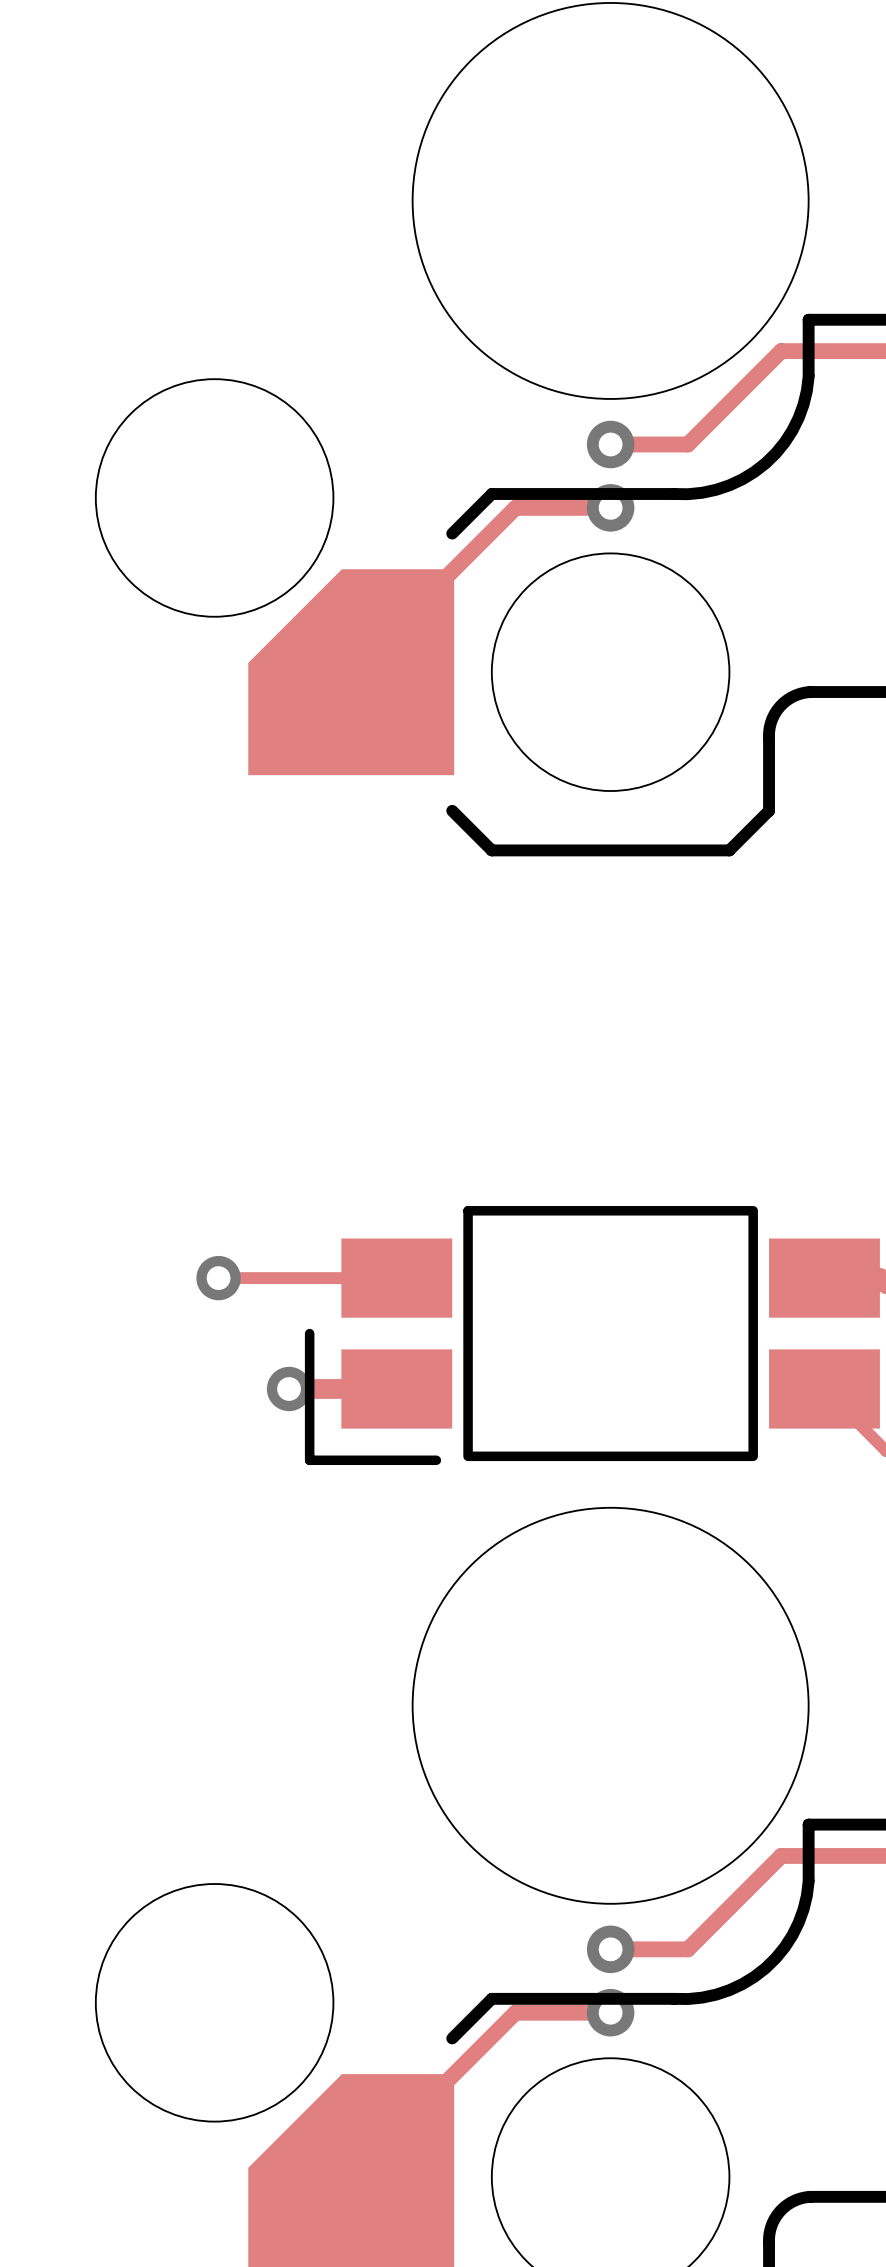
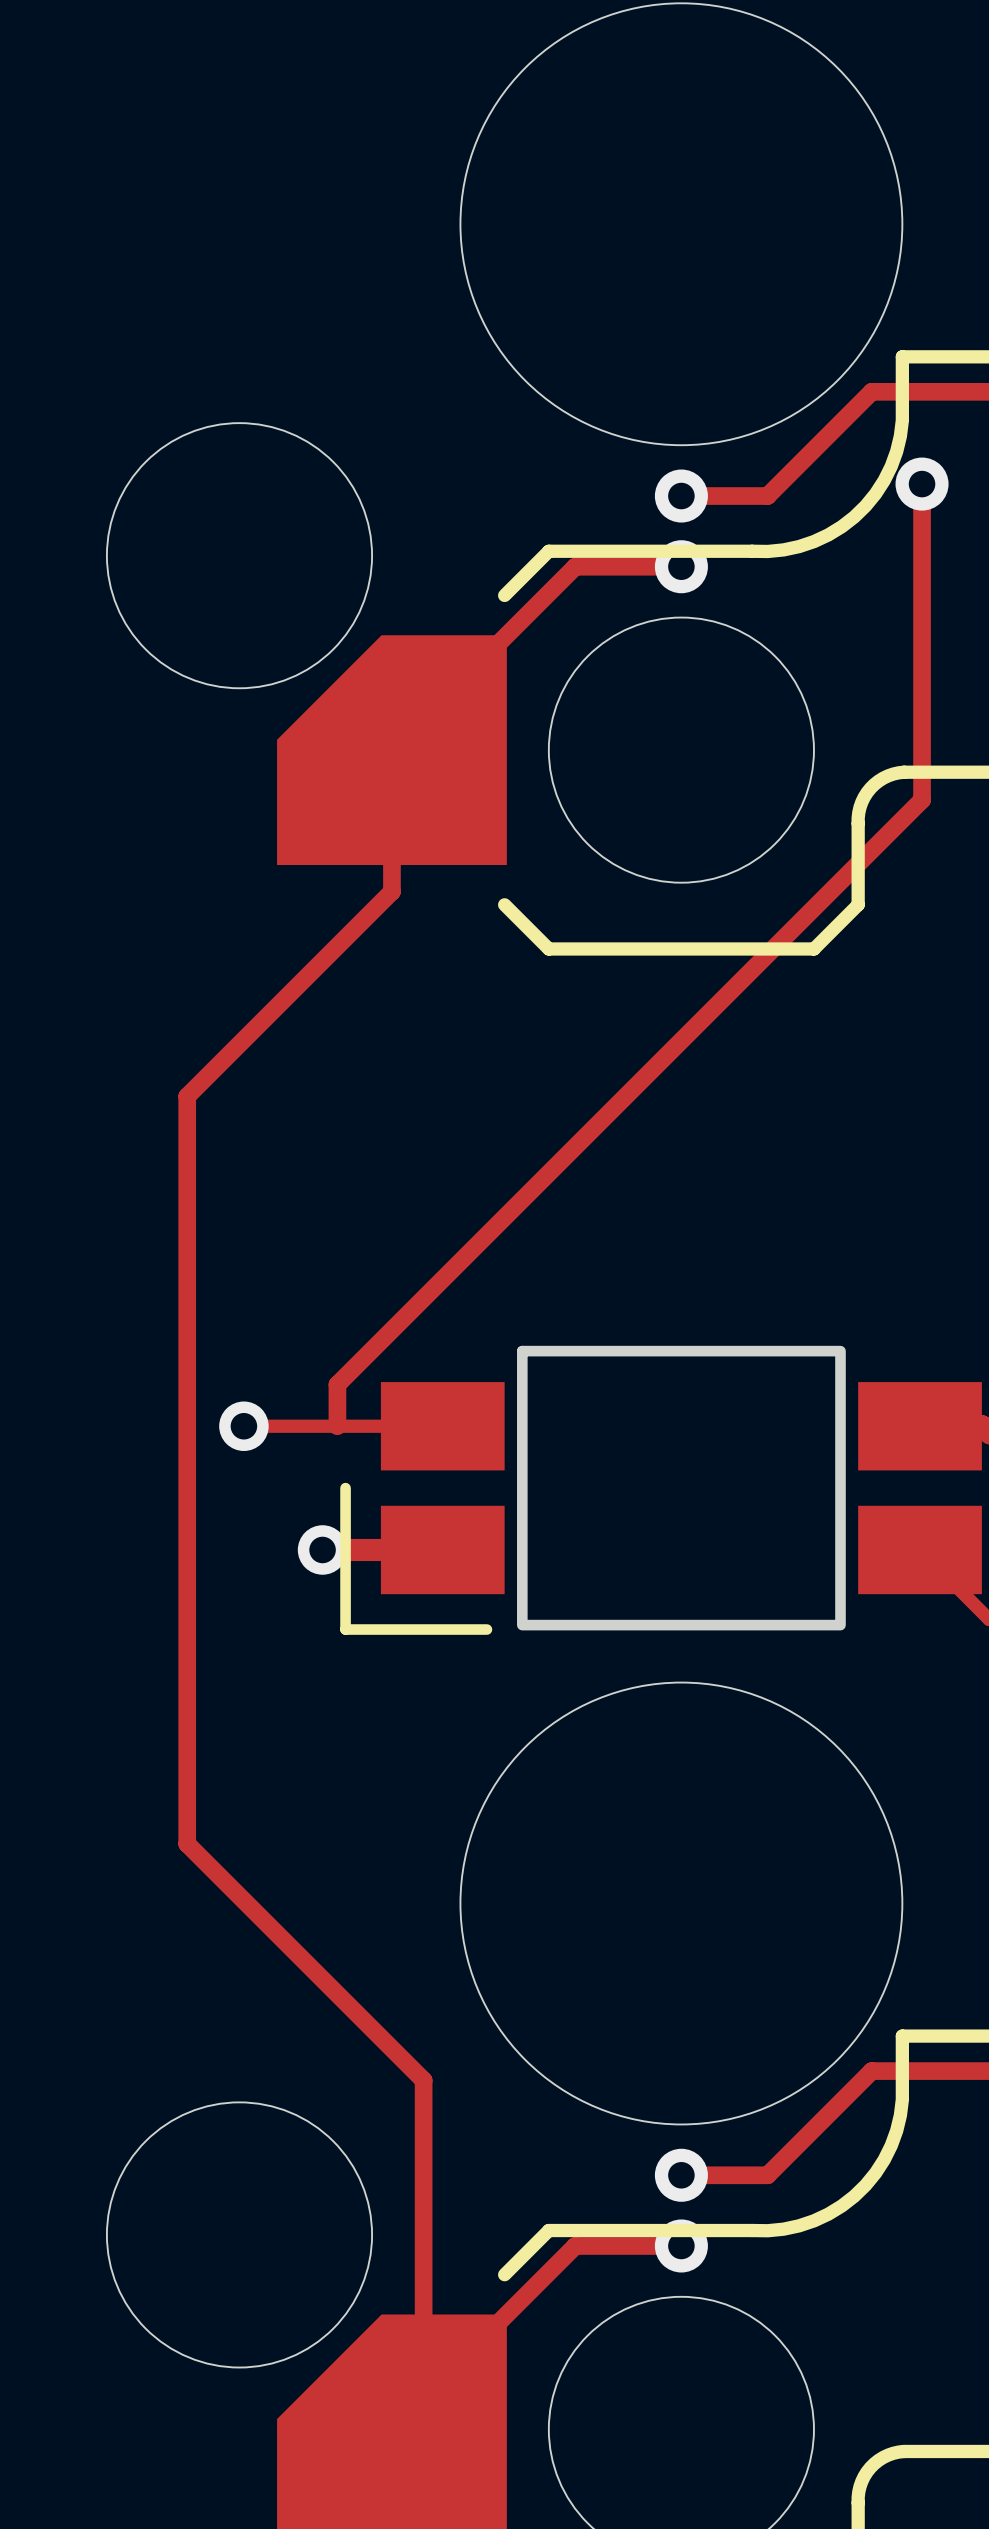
track: none -> (922, 484) (922, 800) (337, 1384) (337, 1426)
via: none -> (922, 484)
track: none -> (391, 750) (391, 891) (187, 1096) (187, 1843) (423, 2080) (423, 2397)

